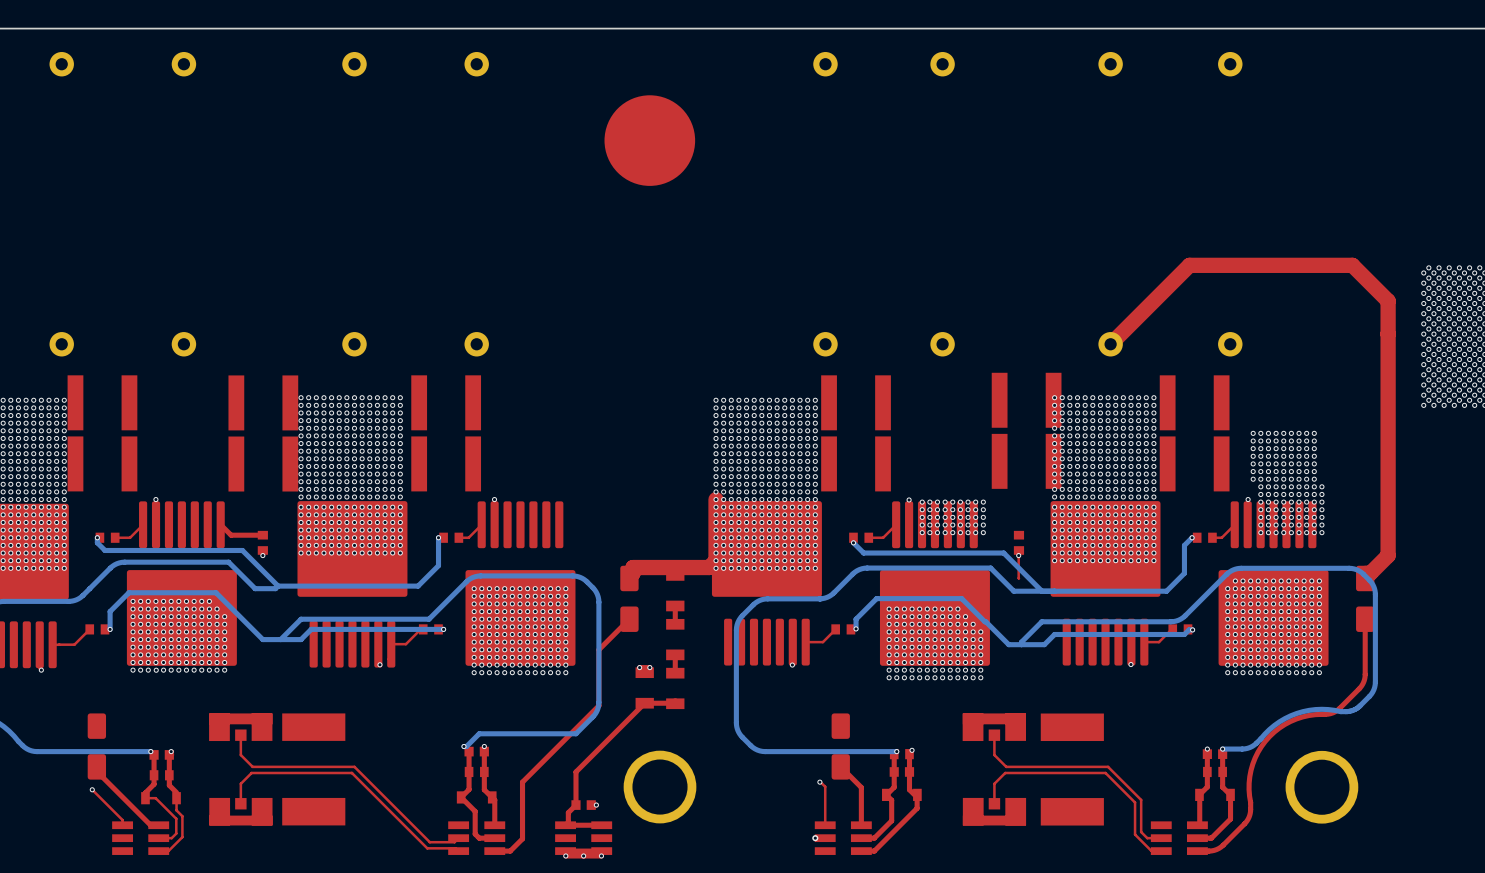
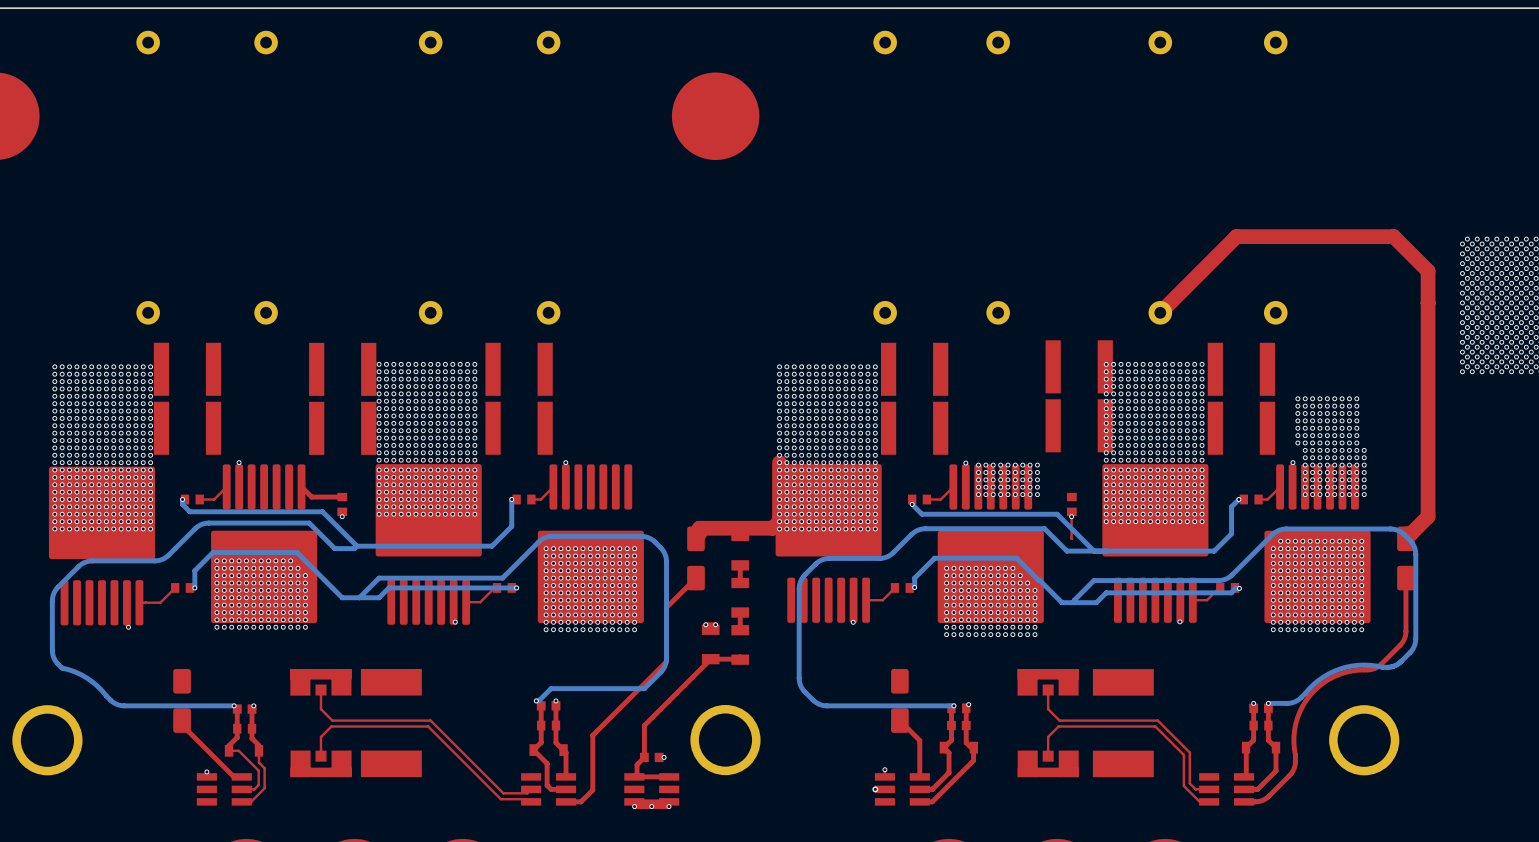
top track: (819, 782) (825, 786) (825, 817) -> none
via position: (819, 782) -> (884, 769)
top track: (92, 789) (122, 820) -> none
via position: (92, 789) -> (206, 771)

